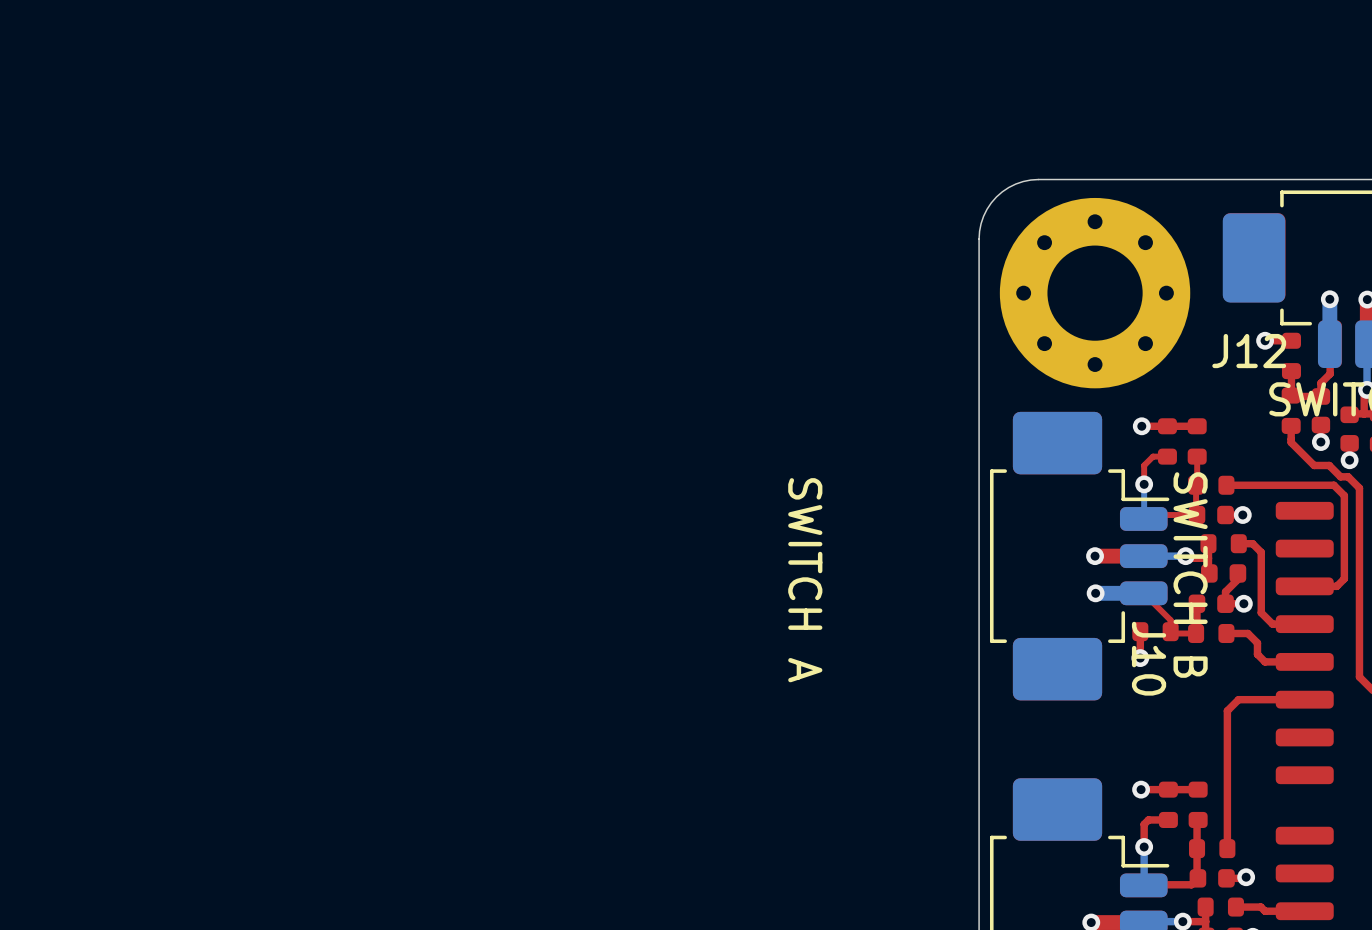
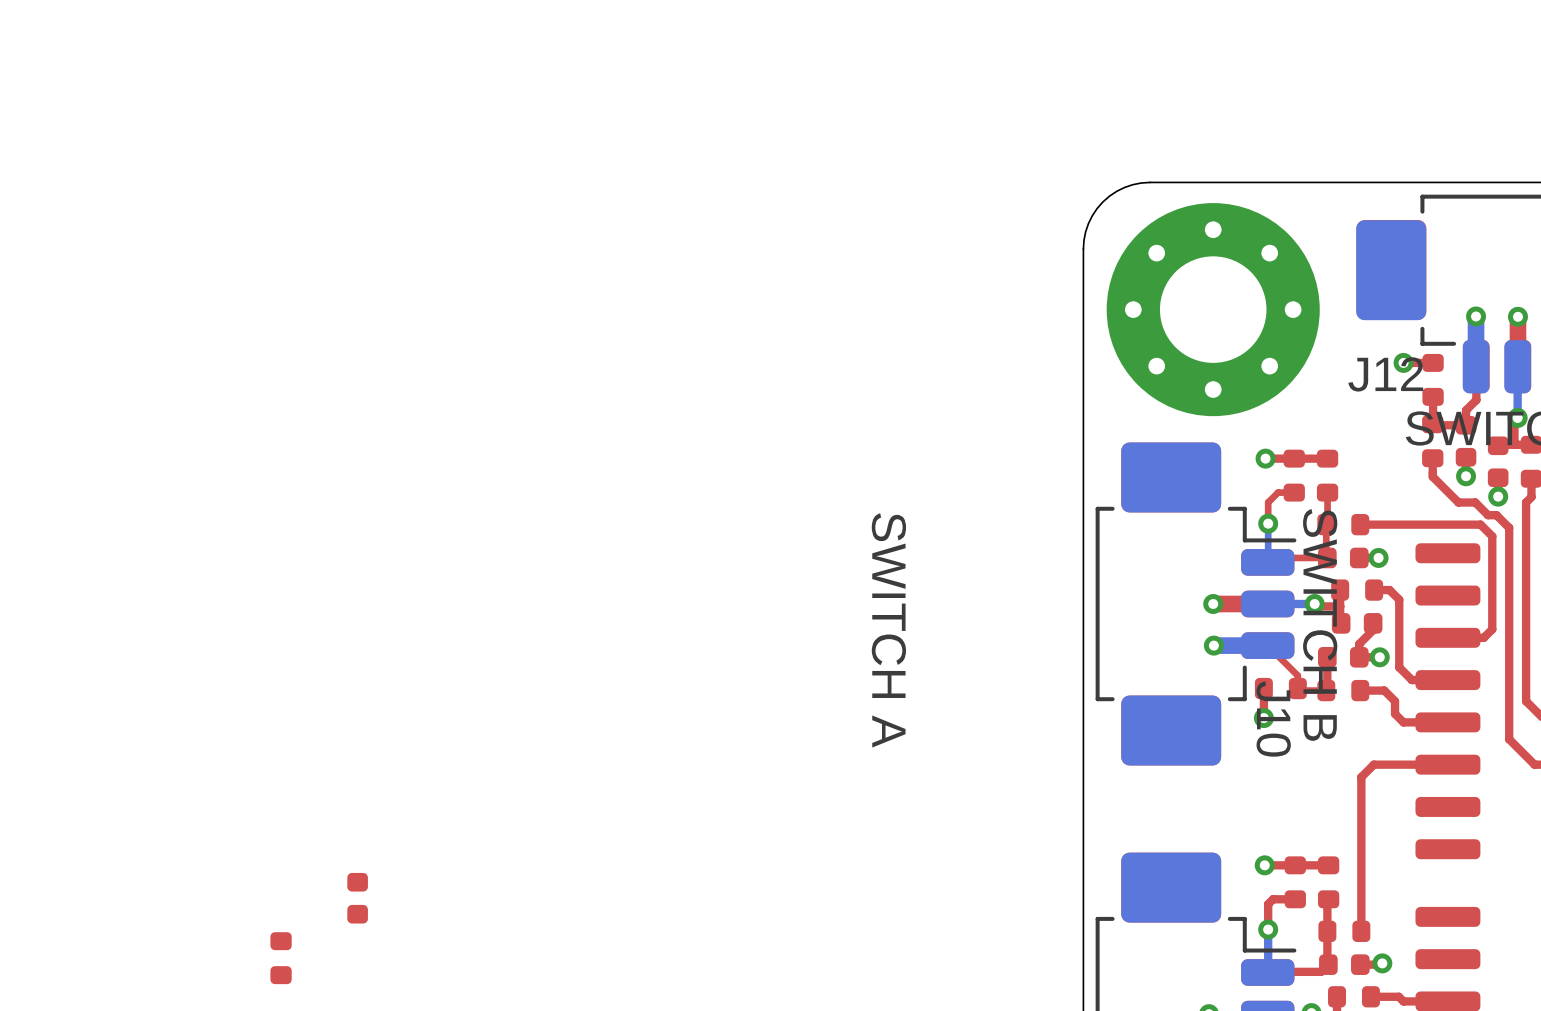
part: none -> (357, 898)
part: none -> (281, 958)

